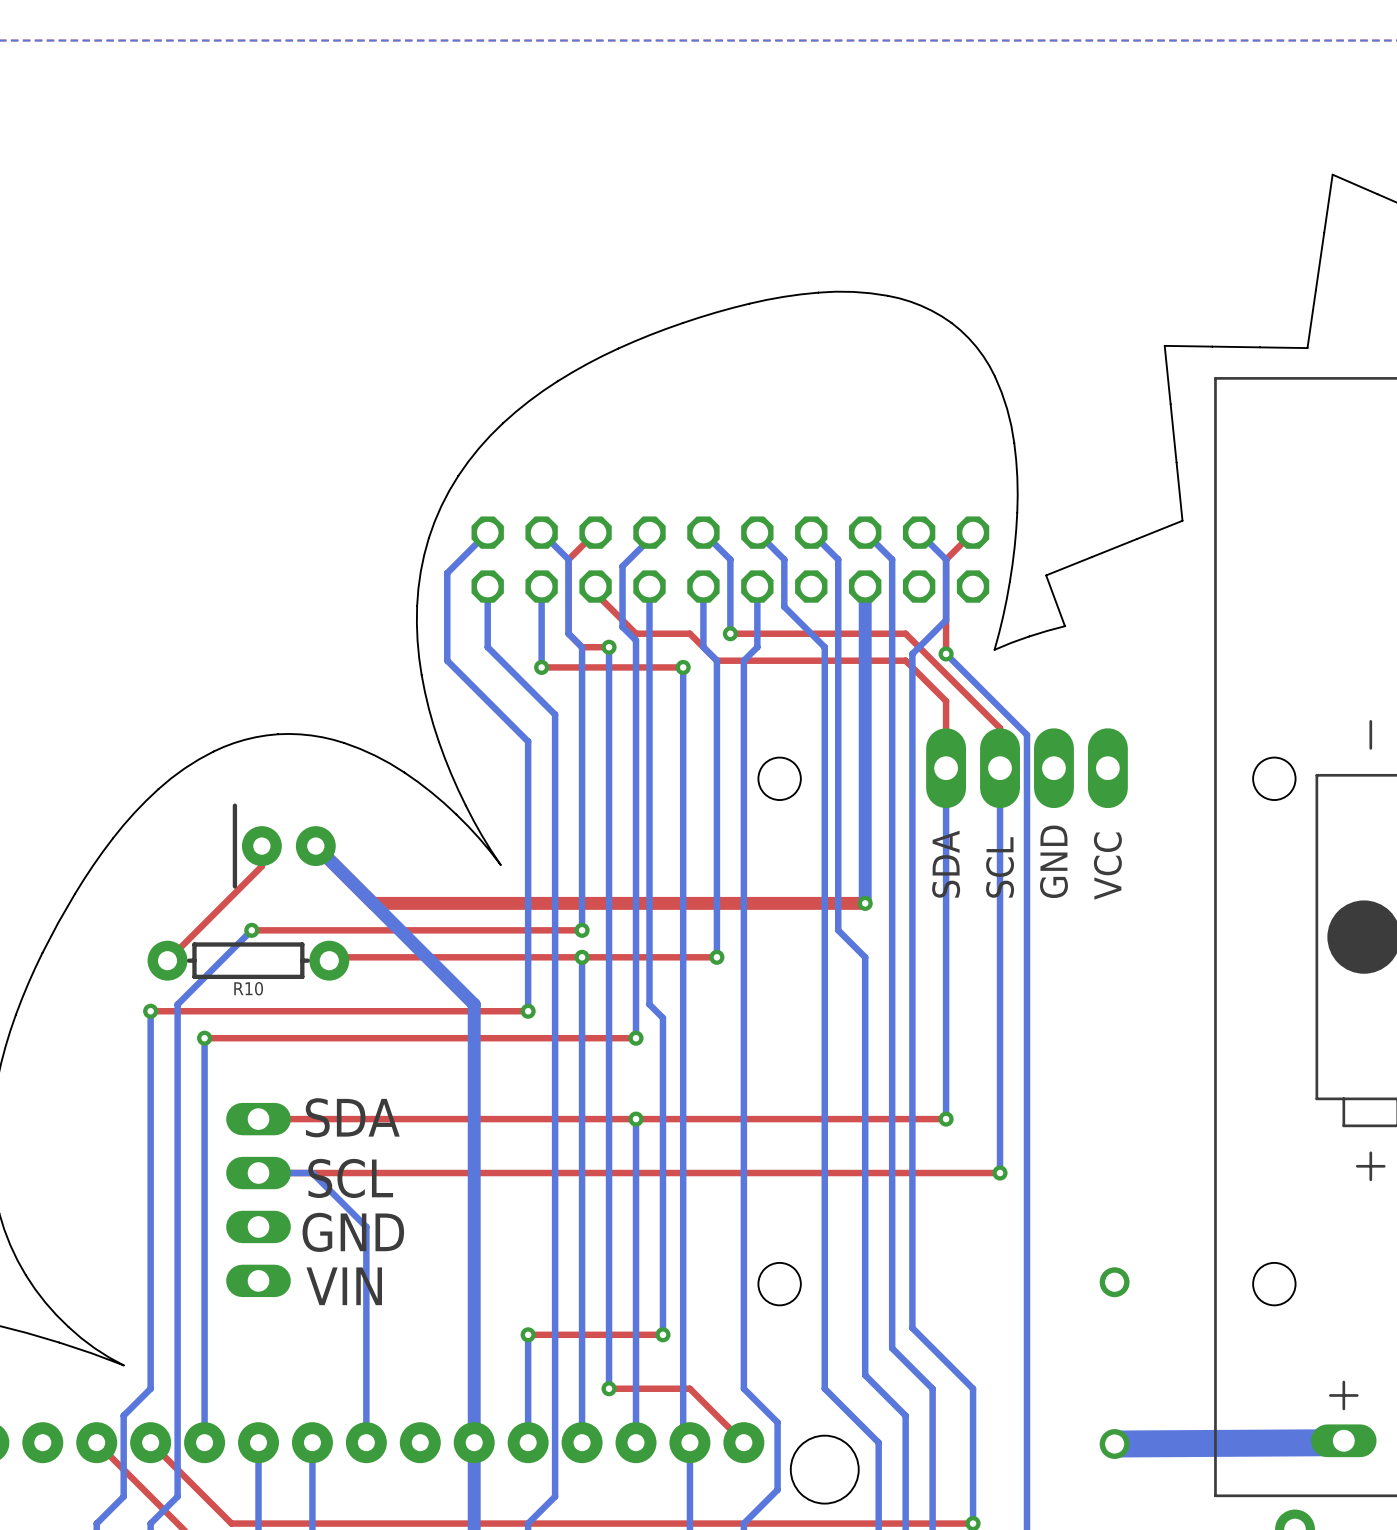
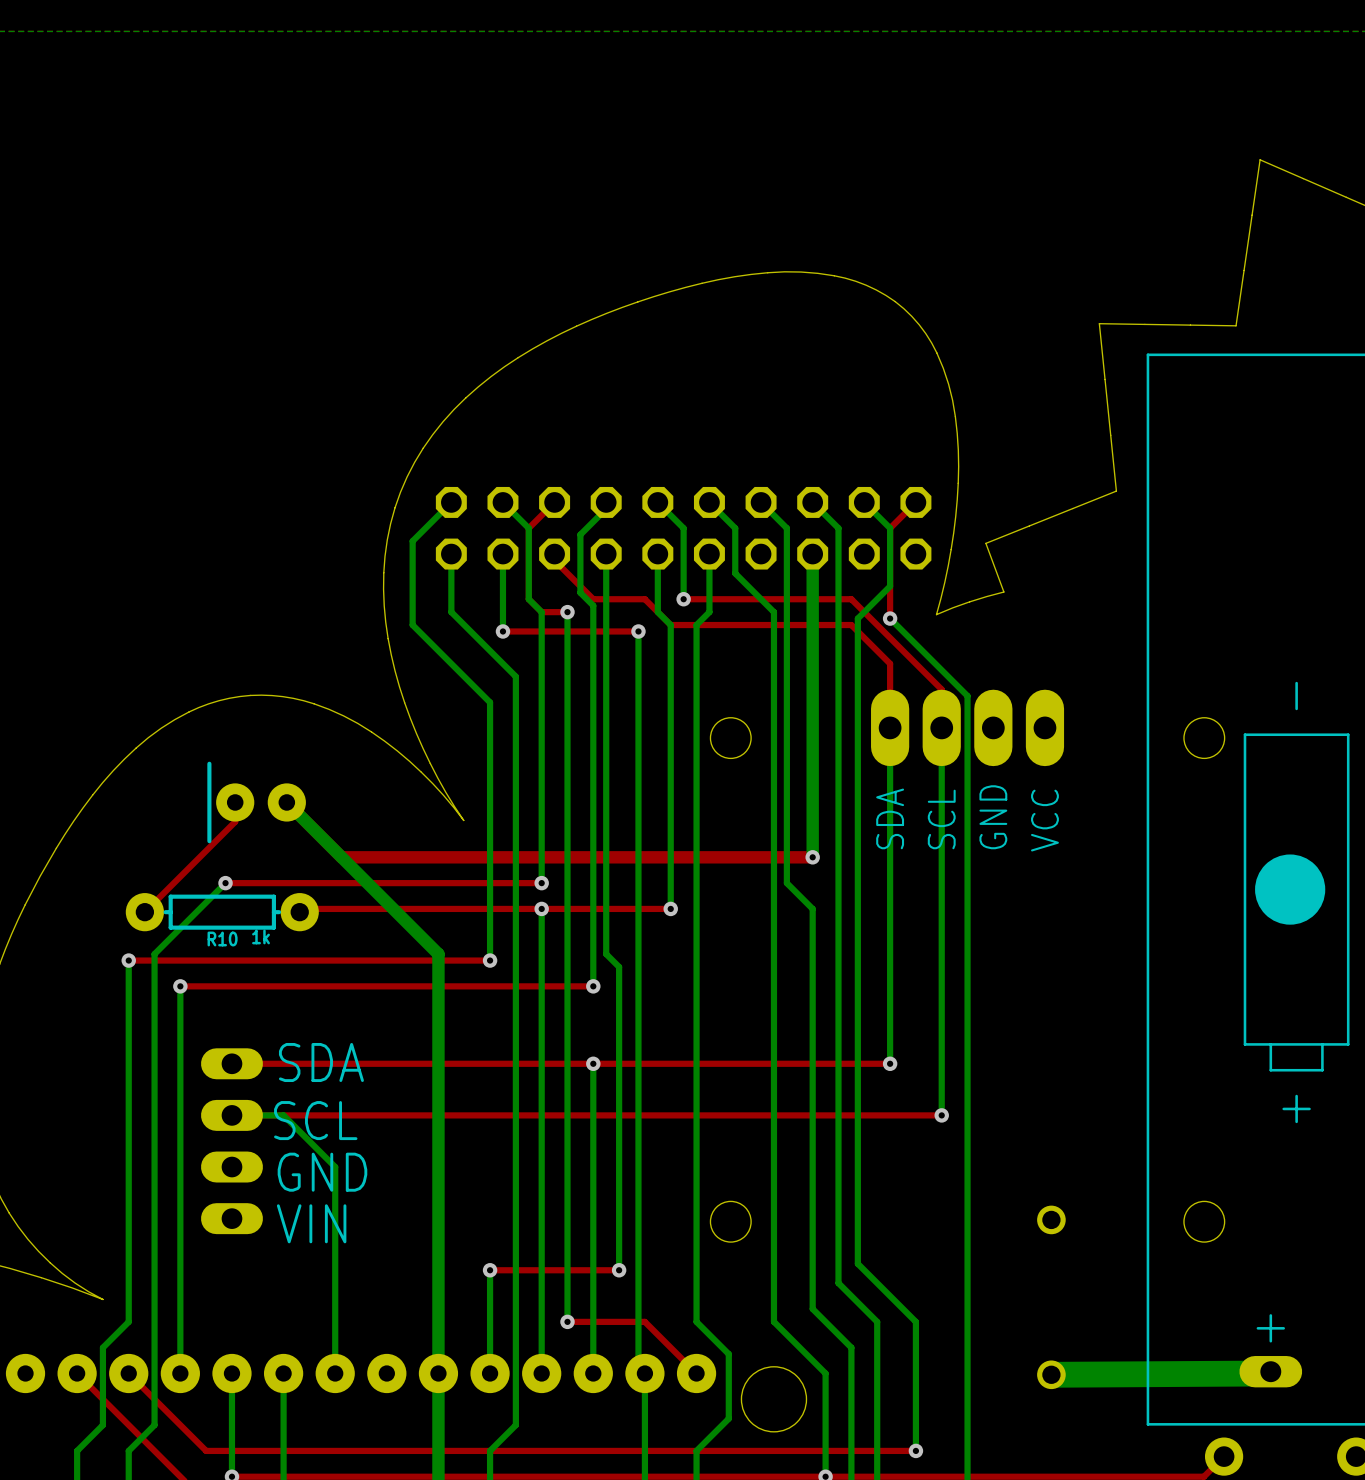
R10 value: none -> 1k (261, 936)

